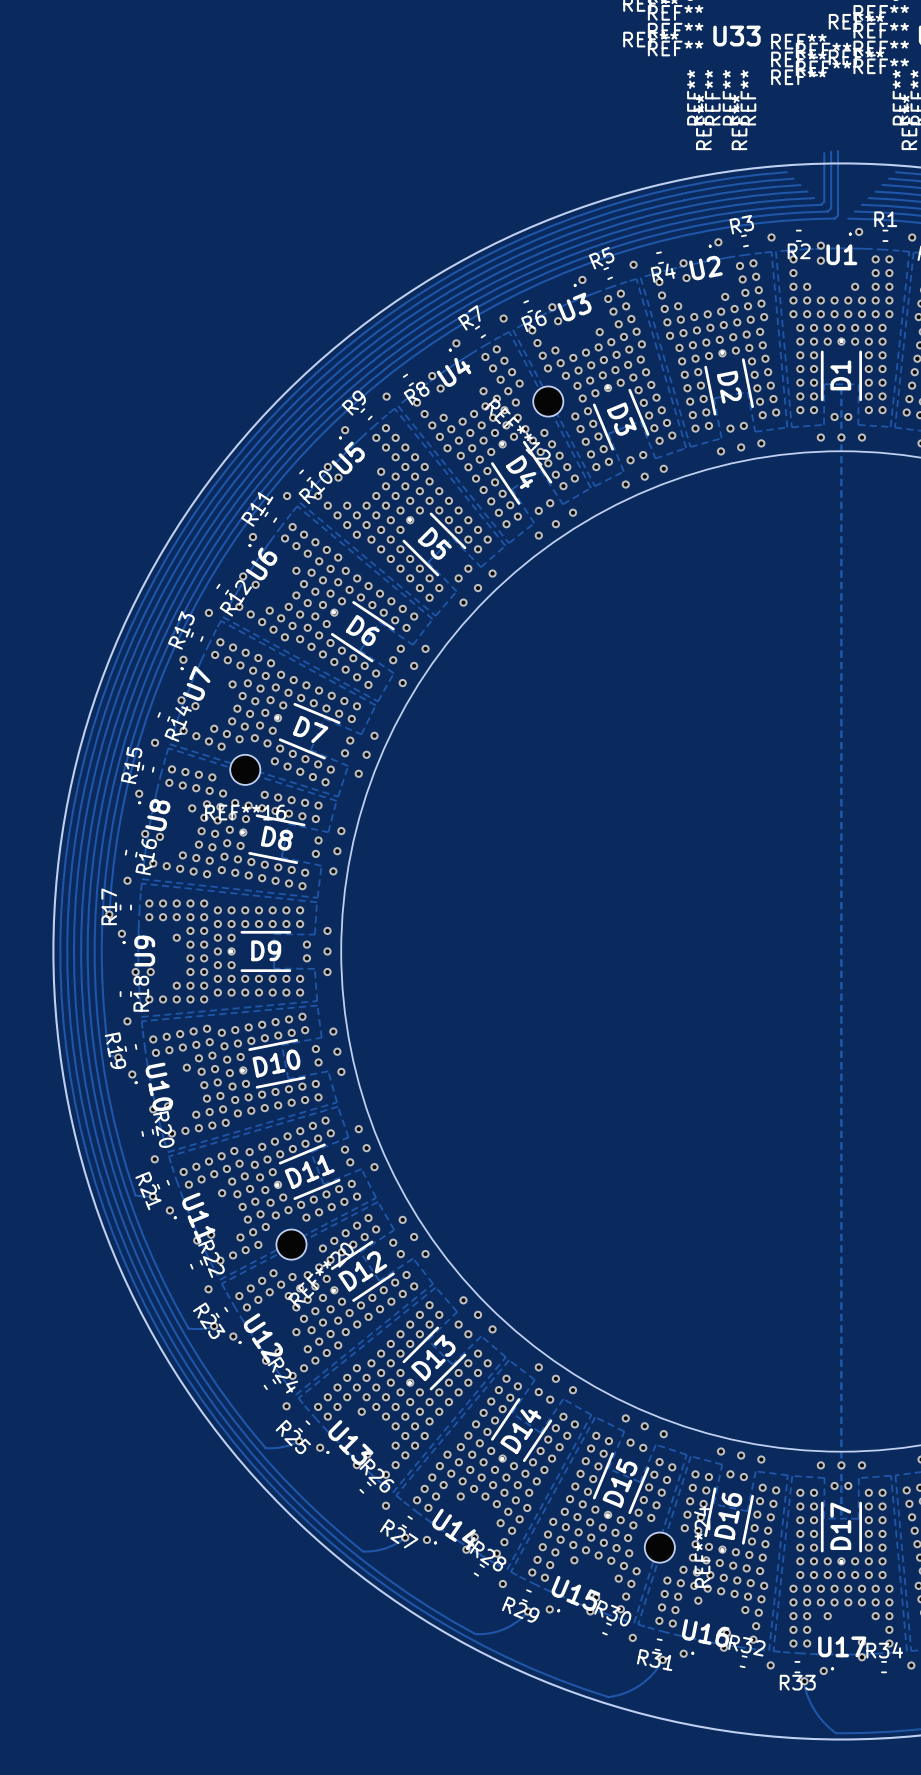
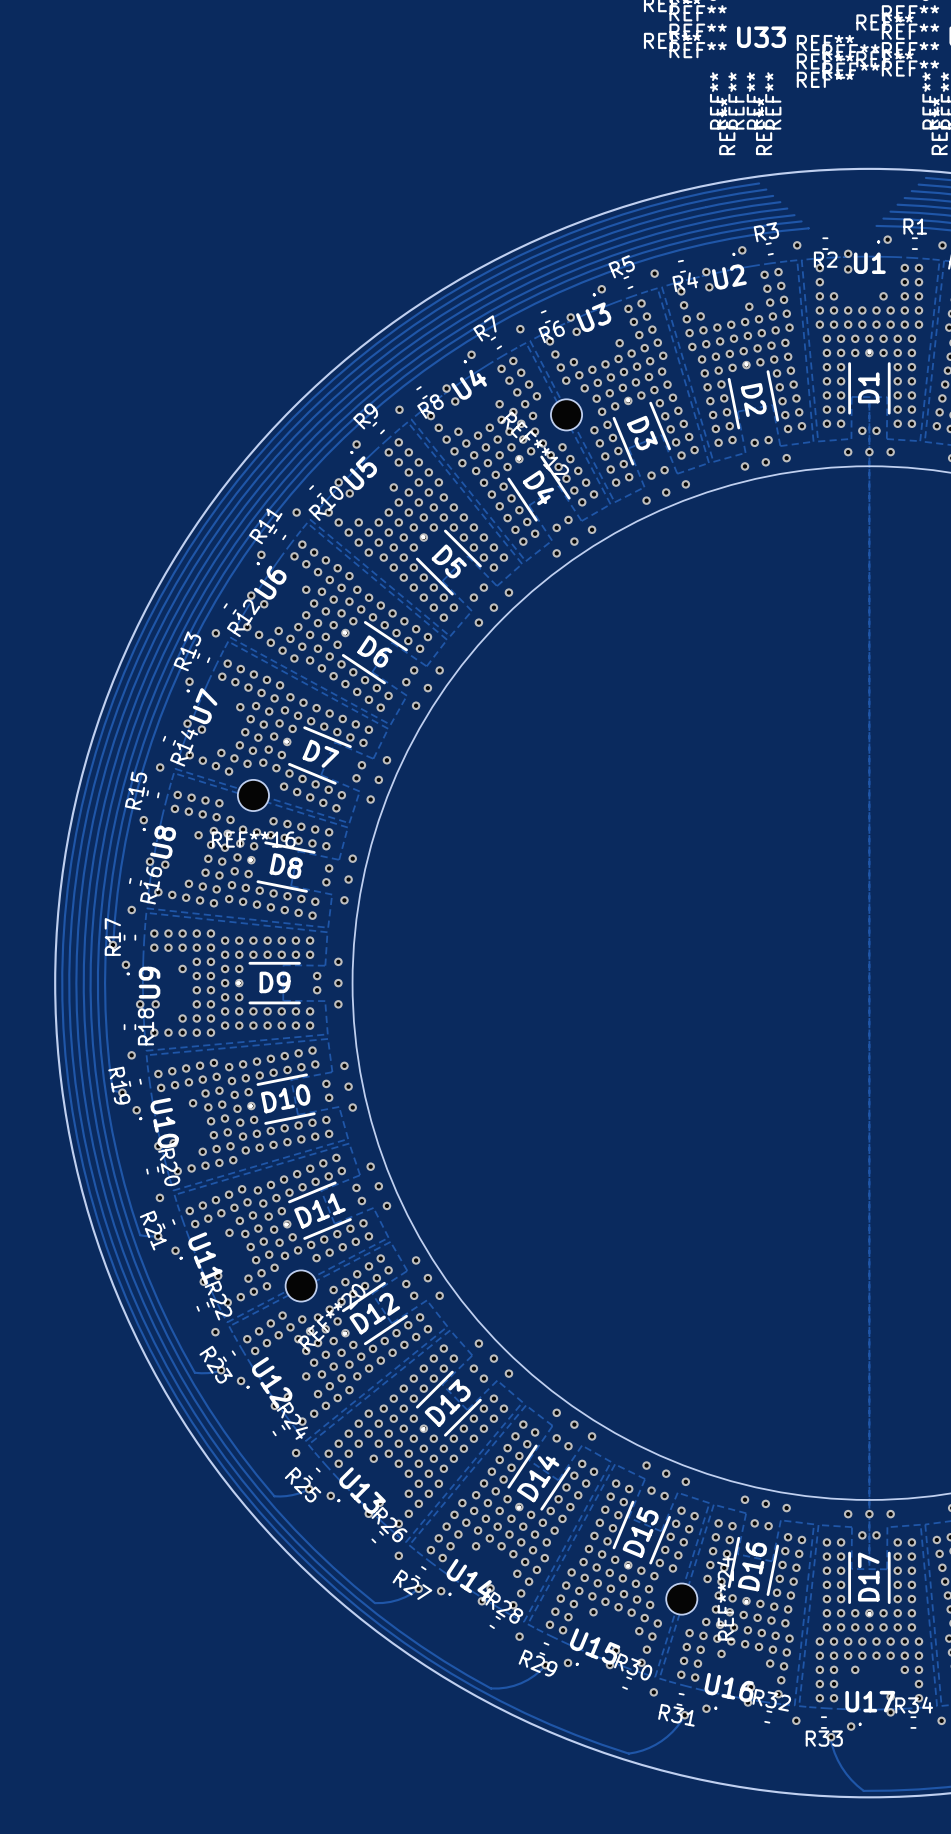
track: (831, 151) (831, 208) (827, 211) (749, 217) (672, 230) (597, 252) (548, 271) (501, 294) (434, 333) (371, 380) (313, 433) (261, 491) (216, 555) (178, 623) (147, 695) (124, 770) (113, 821) (103, 899) (102, 977) (109, 1055) -> (801, 221) (721, 232) (643, 252) (567, 280) (518, 303) (448, 344) (383, 392) (324, 447) (270, 508) (223, 573) (184, 644) (161, 693) (135, 770) (116, 848) (106, 929) (105, 1009) (112, 1090)
track: (838, 151) (838, 215) (834, 218) (784, 220) (709, 230) (636, 247) (564, 272) (496, 304) (431, 343) (371, 389) (316, 440) (266, 497) (236, 537) (209, 580) (174, 647) (155, 693) (132, 765) (117, 839) (109, 914) -> (808, 228) (731, 238) (680, 249) (606, 273) (558, 292) (489, 328) (423, 370) (383, 402) (326, 455) (291, 494) (244, 556) (216, 600) (180, 669) (160, 717) (136, 791) (121, 867) (113, 944)
track: (824, 153) (824, 201) (821, 204) -> none
track: (786, 172) (706, 182) (653, 193) (601, 208) (525, 236) (476, 260) (407, 302) (363, 333) (301, 386) (246, 445) (212, 487) (182, 532) (142, 603) (109, 677) (92, 728) (73, 807) (65, 860) (60, 941) (61, 995) (66, 1049) (80, 1129) (103, 1207) (122, 1257) (158, 1330) (186, 1376) (233, 1442) (269, 1483) (307, 1521) (369, 1573) (436, 1619) (483, 1645) (532, 1669) (608, 1697) -> (759, 183) (704, 193) (649, 206) (570, 233) (519, 255) (469, 281) (399, 327) (354, 361) (293, 417) (255, 459) (204, 525) (174, 572) (135, 647) (104, 725) (88, 778) (76, 833) (64, 916) (62, 1000) (65, 1056) (77, 1139) (90, 1193) (116, 1273) (138, 1324) (177, 1398) (207, 1445) (241, 1490) (278, 1532) (338, 1590) (381, 1626) (427, 1658) (499, 1700) (550, 1724) (628, 1753)
track: (793, 178) (741, 183) (689, 192) (637, 204) (562, 229) (490, 261) (444, 286) (400, 315) (337, 363) (298, 399) (262, 437) (228, 478) (183, 543) (145, 612) (124, 660) (98, 735) (85, 786) (75, 838) (67, 916) (67, 969) (73, 1048) (81, 1100) (93, 1151) (117, 1226) (138, 1275) (174, 1345) (203, 1390) (251, 1452) (286, 1491) (324, 1528) (365, 1562) (407, 1593) (475, 1634) -> (766, 189) (685, 204) (633, 218) (581, 236) (531, 257) (483, 282) (436, 310) (369, 358) (328, 393) (271, 451) (236, 493) (204, 537) (162, 608) (128, 682) (109, 733) (94, 785) (82, 838) (74, 892) (69, 974) (72, 1055) (79, 1109) (89, 1163) (112, 1242) (131, 1292) (154, 1342) (180, 1390) (209, 1436) (259, 1501) (296, 1541) (335, 1579) (398, 1630) (444, 1661) (491, 1688)
track: (800, 185) (747, 189) (695, 198) (643, 209) (593, 225) (543, 244) (495, 266) (426, 305) (383, 335) (341, 368) (284, 423) (249, 463) (216, 505) (187, 549) (161, 595) (128, 667) (110, 717) (96, 768) (85, 820) (75, 899) (73, 951) (75, 1004) (81, 1057) (90, 1109) (103, 1161) (119, 1211) (138, 1260) (174, 1331) (202, 1376) (233, 1419) (267, 1460) (303, 1498) (362, 1551) -> (773, 195) (719, 204) (665, 216) (613, 232) (562, 251) (512, 274) (464, 301) (396, 346) (353, 380) (313, 417) (275, 457) (240, 499) (208, 544) (167, 614) (143, 664) (123, 715) (106, 767) (93, 820) (83, 874) (78, 928) (76, 983) (78, 1038) (88, 1119) (99, 1173) (114, 1225) (132, 1277) (154, 1327) (180, 1375) (209, 1422) (240, 1466) (275, 1509) (313, 1548) (374, 1603)
track: (807, 191) (754, 195) (701, 203) (649, 215) (599, 230) (549, 249) (500, 271) (454, 296) (409, 325) (366, 357) (326, 391) (288, 429) (253, 469) (221, 511) (192, 555) (166, 602) (143, 650) (123, 699) (108, 750) (95, 802) (87, 854) (82, 907) (81, 960) (83, 1013) (89, 1066) (99, 1118) (113, 1170) (130, 1220) (150, 1269) (174, 1317) (201, 1362) (232, 1406) (265, 1448) -> (780, 202) (725, 210) (672, 222) (619, 237) (568, 257) (518, 280) (469, 306) (423, 335) (379, 368) (337, 404) (298, 443) (262, 484) (228, 527) (184, 597) (159, 646) (137, 696) (119, 748) (104, 801) (94, 855) (87, 910) (83, 992) (86, 1047) (92, 1101) (102, 1155) (116, 1209) (134, 1261) (155, 1311) (180, 1360) (208, 1408) (239, 1453) (274, 1496)
track: (814, 198) (736, 204) (685, 213) (635, 226) (586, 242) (538, 261) (491, 283) (446, 309) (403, 337) (362, 369) (323, 403) (287, 440) (237, 499) (208, 542) (181, 586) (158, 632) (138, 680) (121, 729) (107, 779) (93, 855) (88, 906) (87, 958) (89, 1010) (95, 1061) (105, 1112) (117, 1162) (143, 1235) (164, 1283) (188, 1328) -> (787, 208) (734, 215) (682, 227) (630, 241) (580, 259) (531, 281) (484, 306) (416, 349) (374, 381) (334, 417) (279, 475) (245, 516) (215, 560) (175, 630) (142, 703) (125, 753) (111, 805) (96, 883) (91, 937) (90, 990) (92, 1043) (98, 1097) (114, 1175) (129, 1226) (148, 1276) (169, 1325) (194, 1372)
track: (821, 204) (769, 208) (717, 214) (641, 231) (568, 256) (520, 277) (474, 301) (408, 342) (367, 374) (328, 408) (274, 464) (227, 526) (186, 592) (152, 662) (134, 711) (119, 761) (103, 837) (95, 914) (94, 966) (97, 1018) (108, 1095) (120, 1145) (135, 1195) -> (794, 215) (715, 227) (637, 247) (561, 275) (513, 298) (466, 324) (400, 370) (339, 422) (301, 460) (266, 501) (220, 566) (180, 636) (147, 709) (123, 786) (111, 838) (103, 891) (97, 971) (99, 1025) (103, 1078) (117, 1157) (140, 1235)

